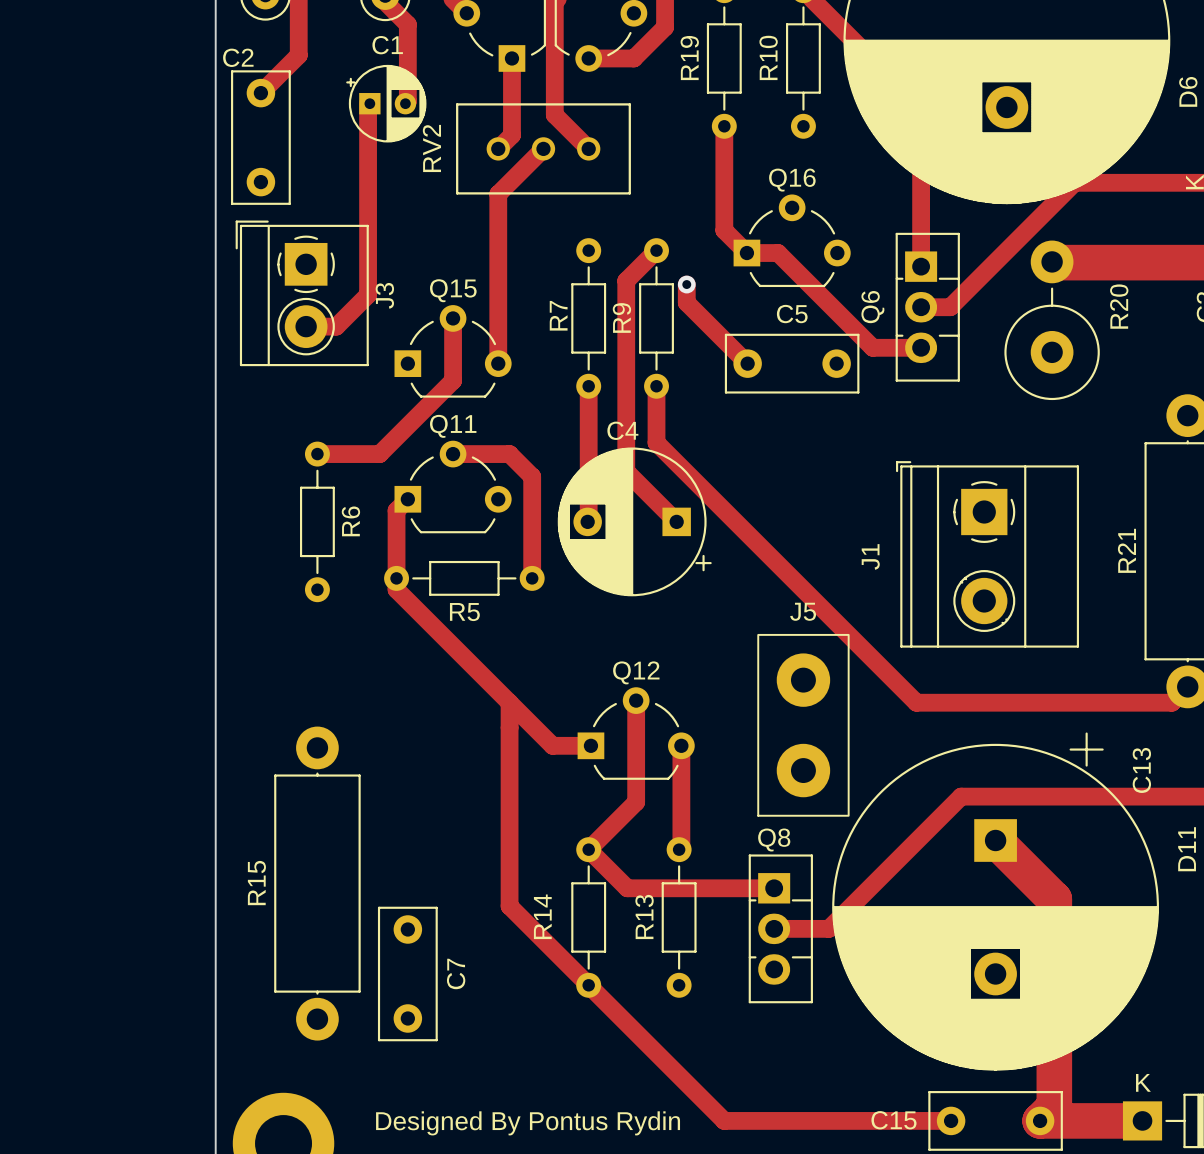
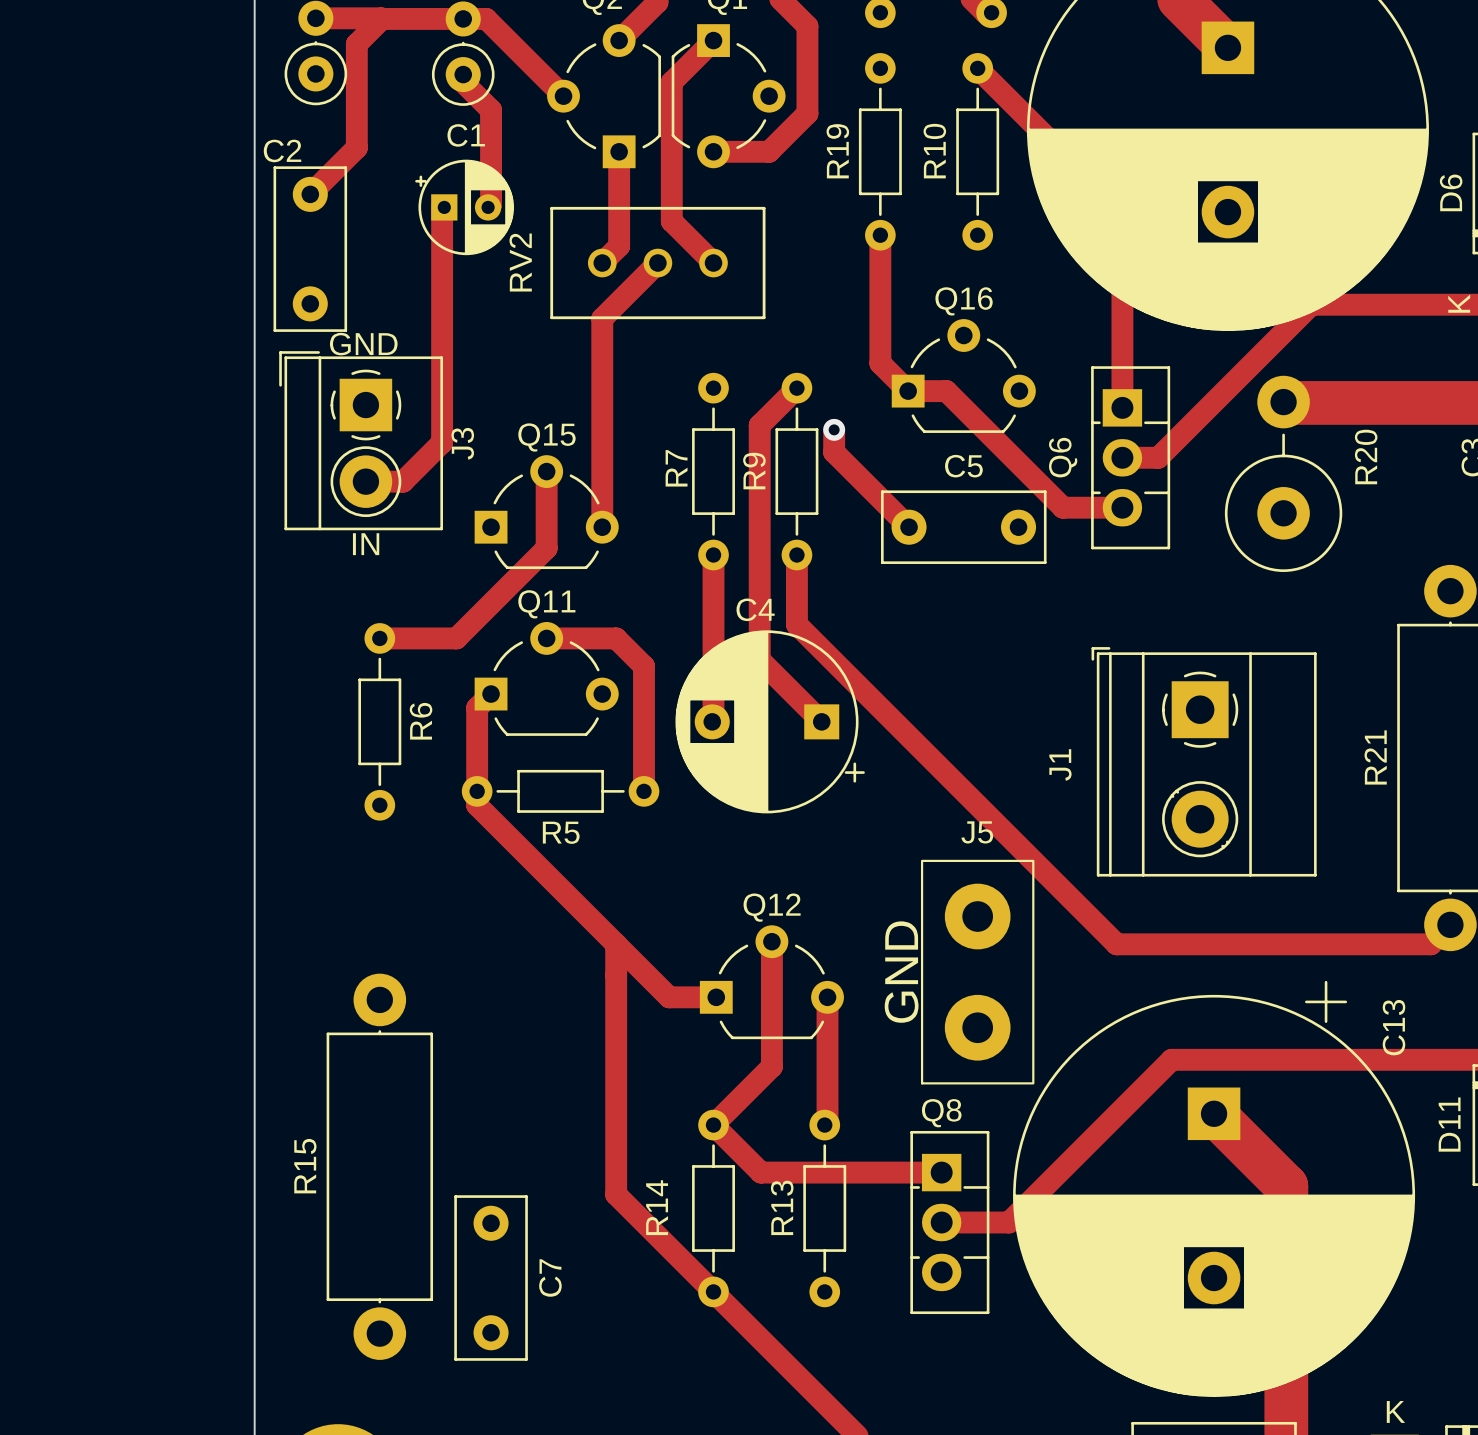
text: none -> GND (363, 344)
text: none -> IN (366, 544)
text: none -> GND (901, 972)

